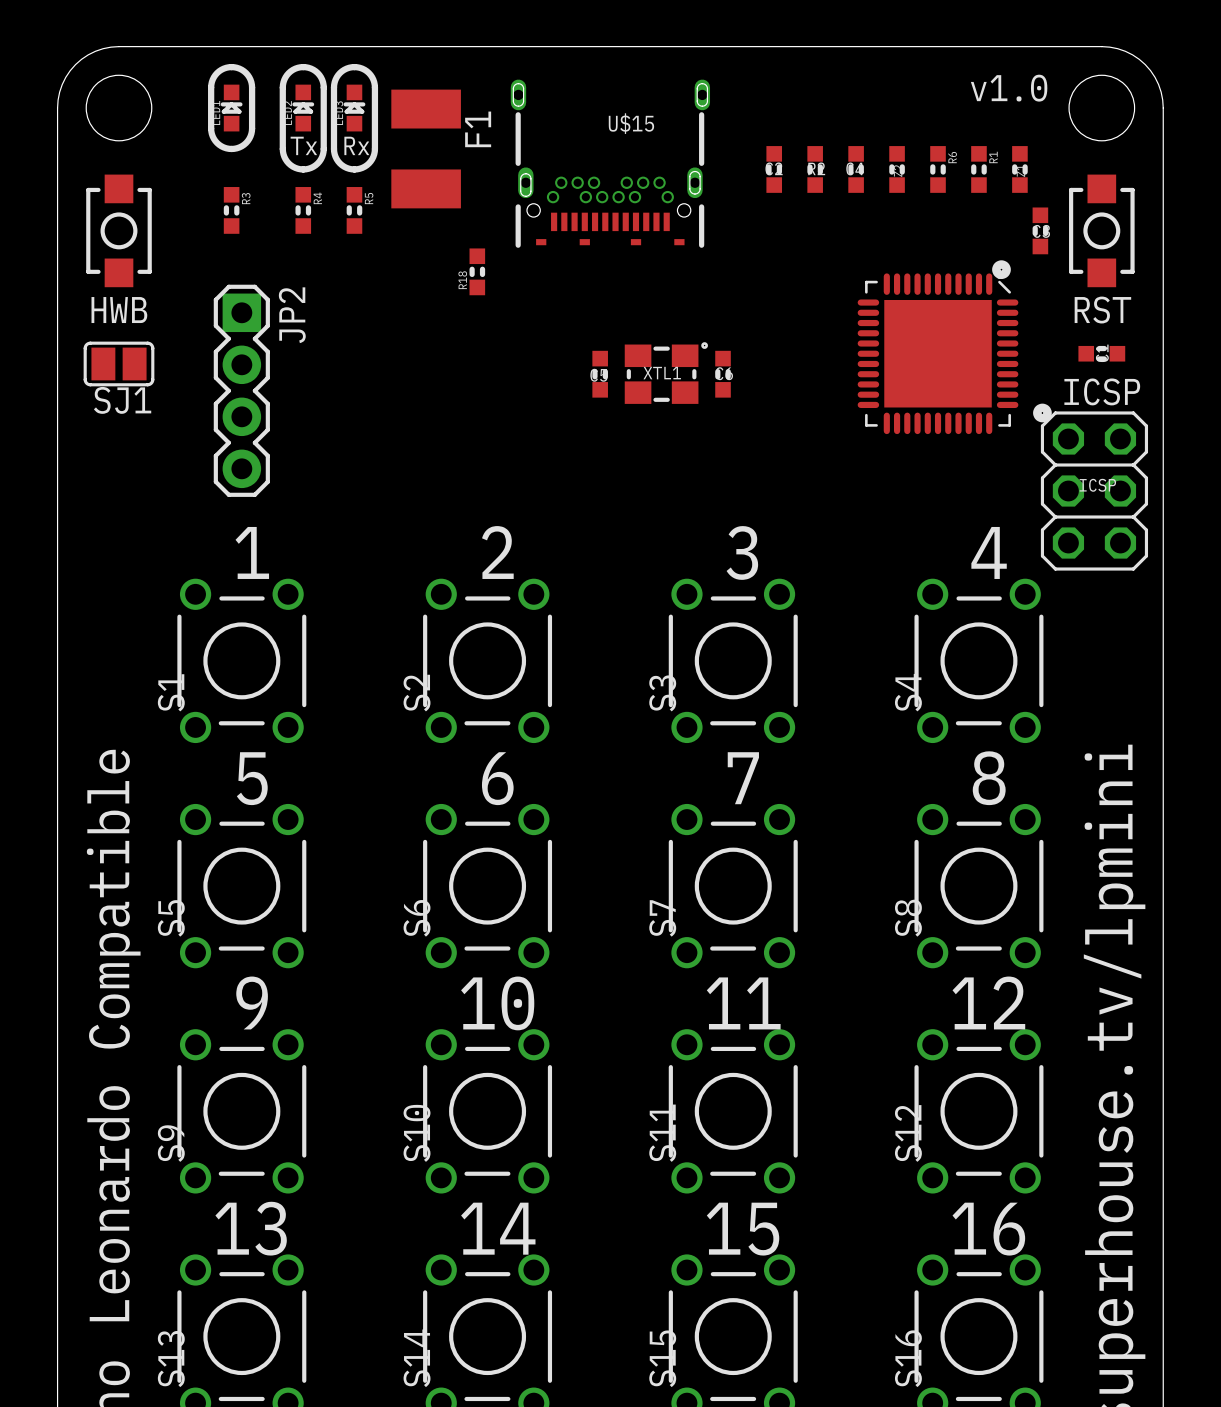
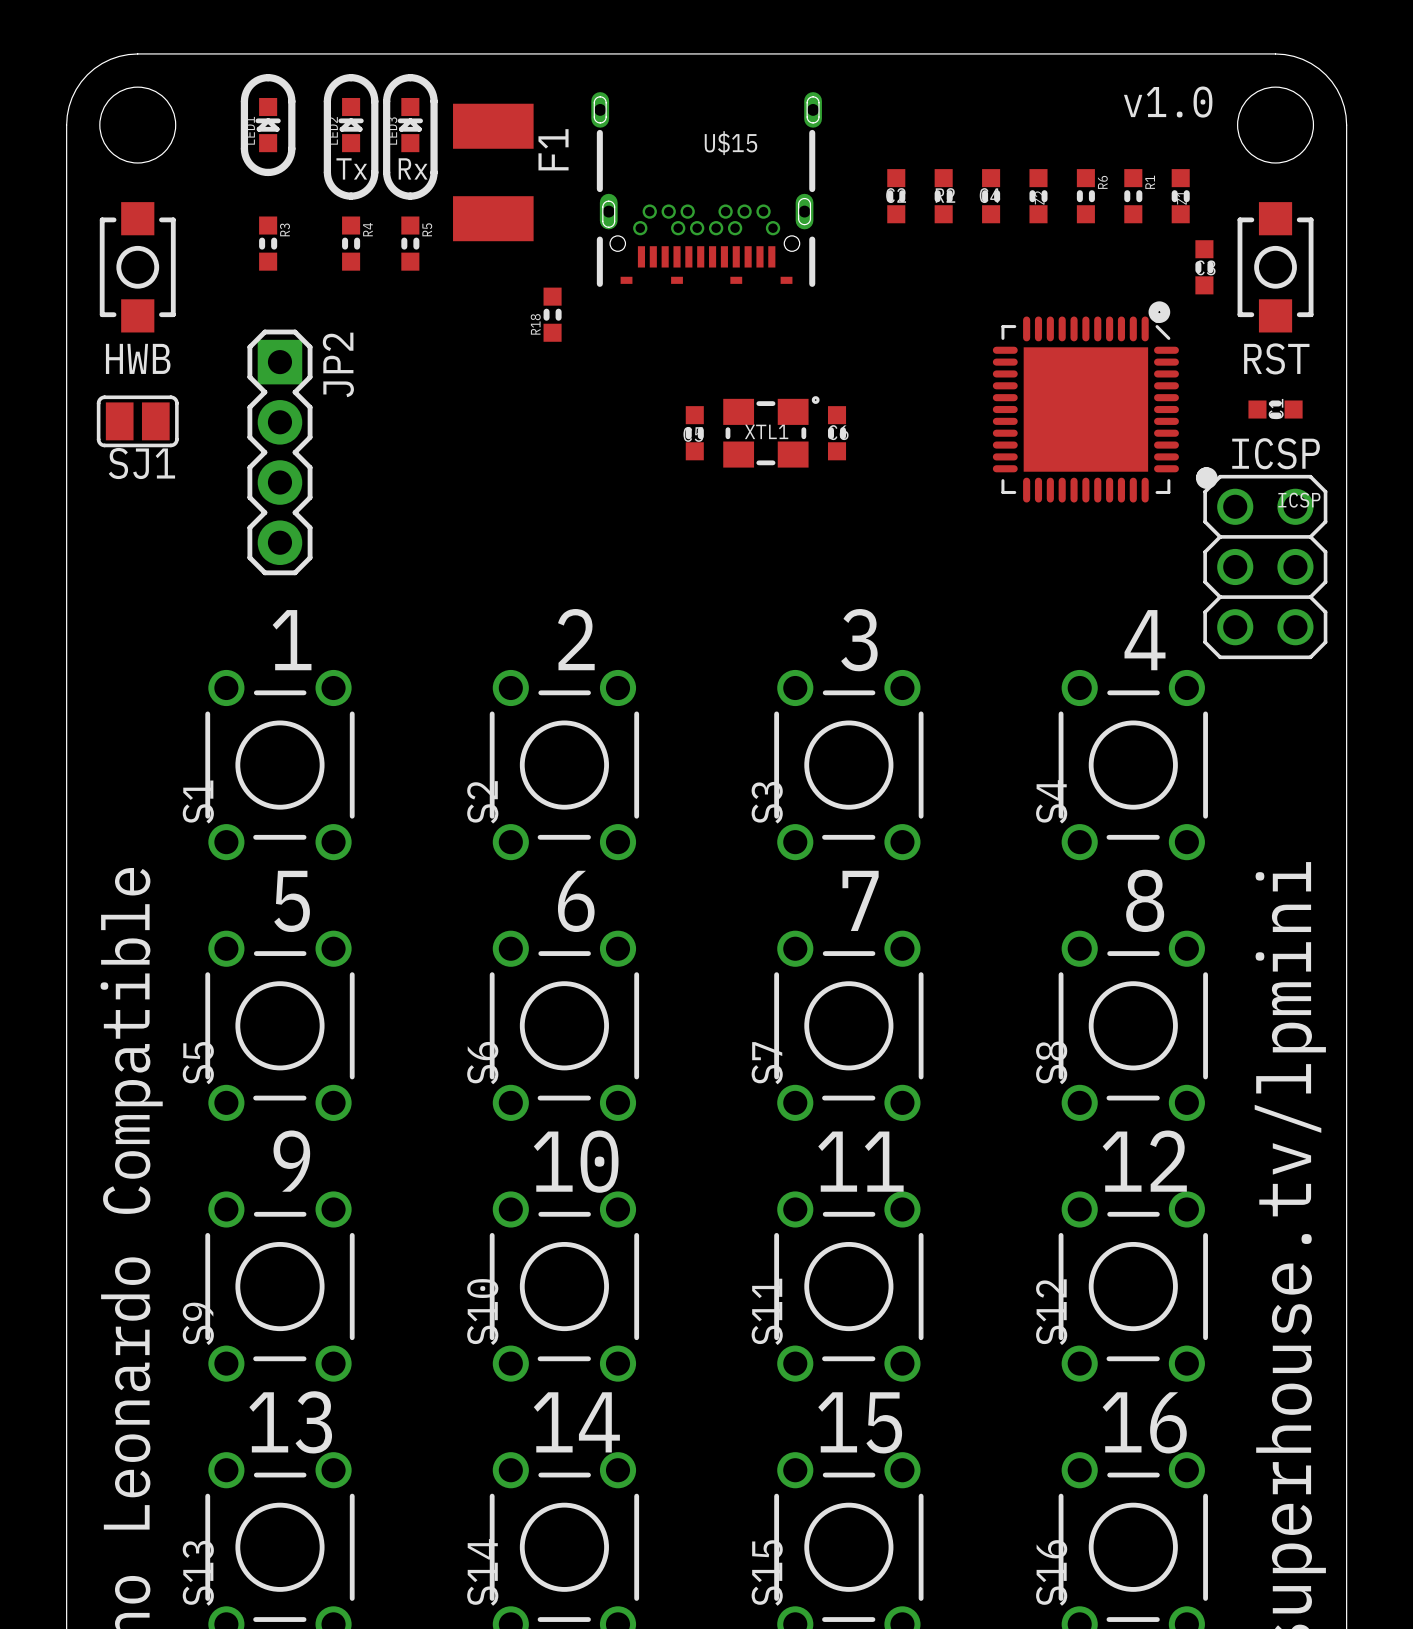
ICSP footprint: [1040, 411, 1149, 571] -> [1196, 467, 1328, 660]
ICSP name position: ICSP (1097, 485) -> ICSP (1299, 500)

